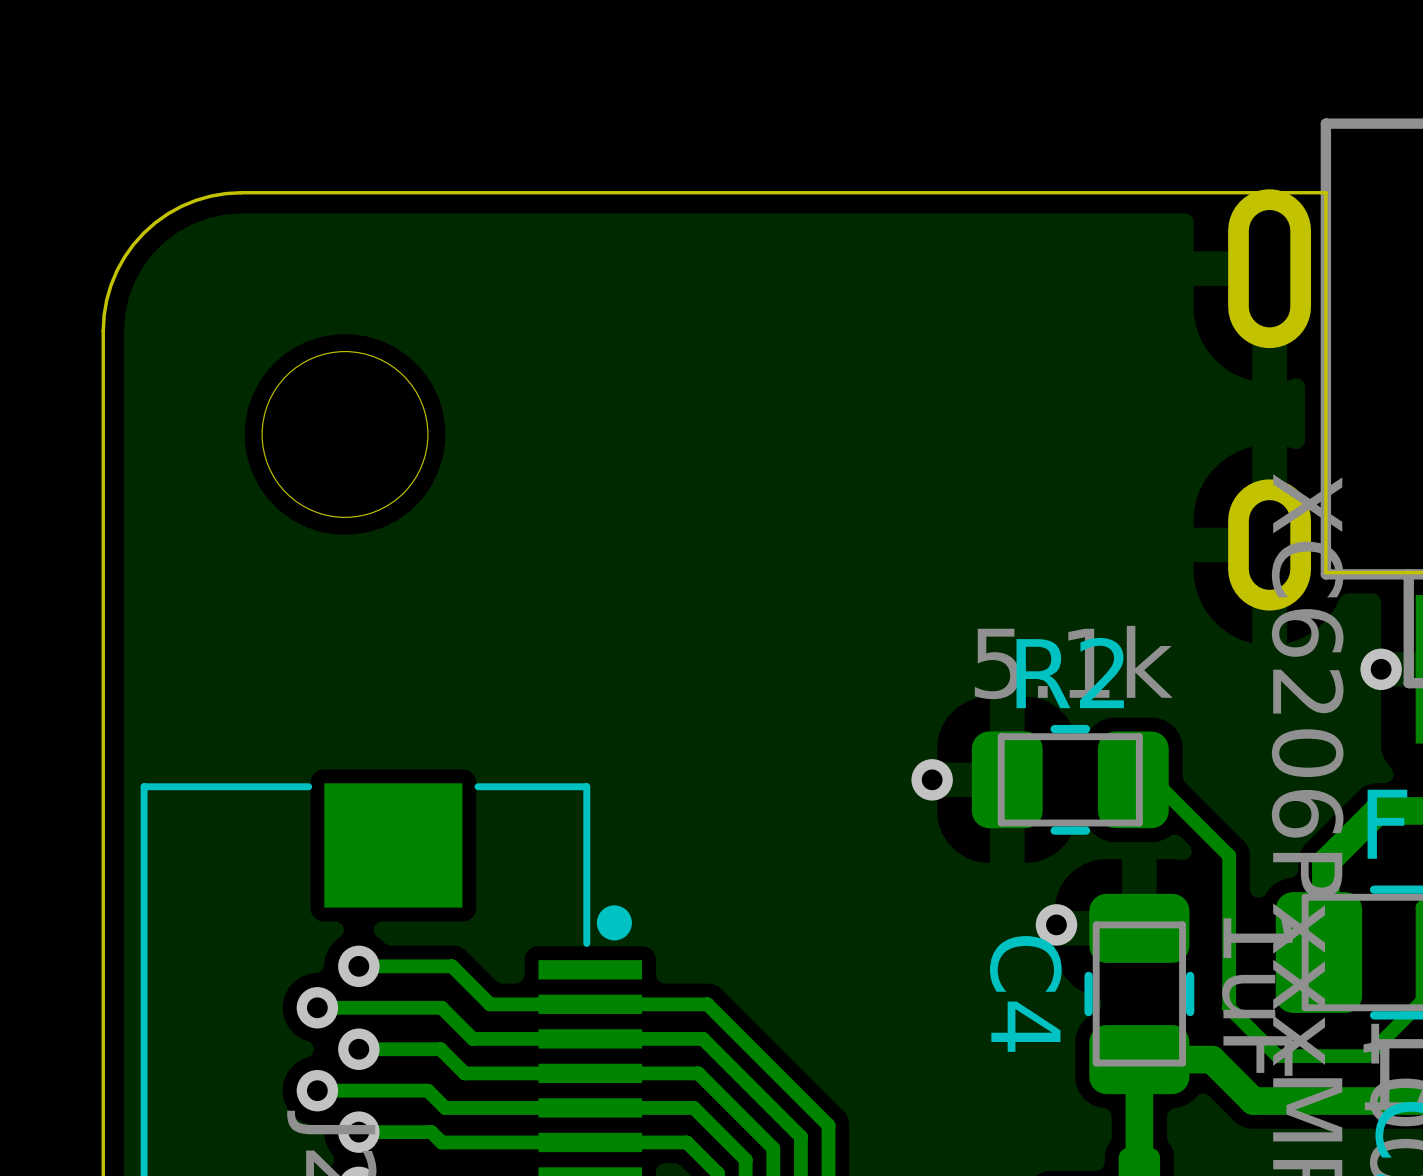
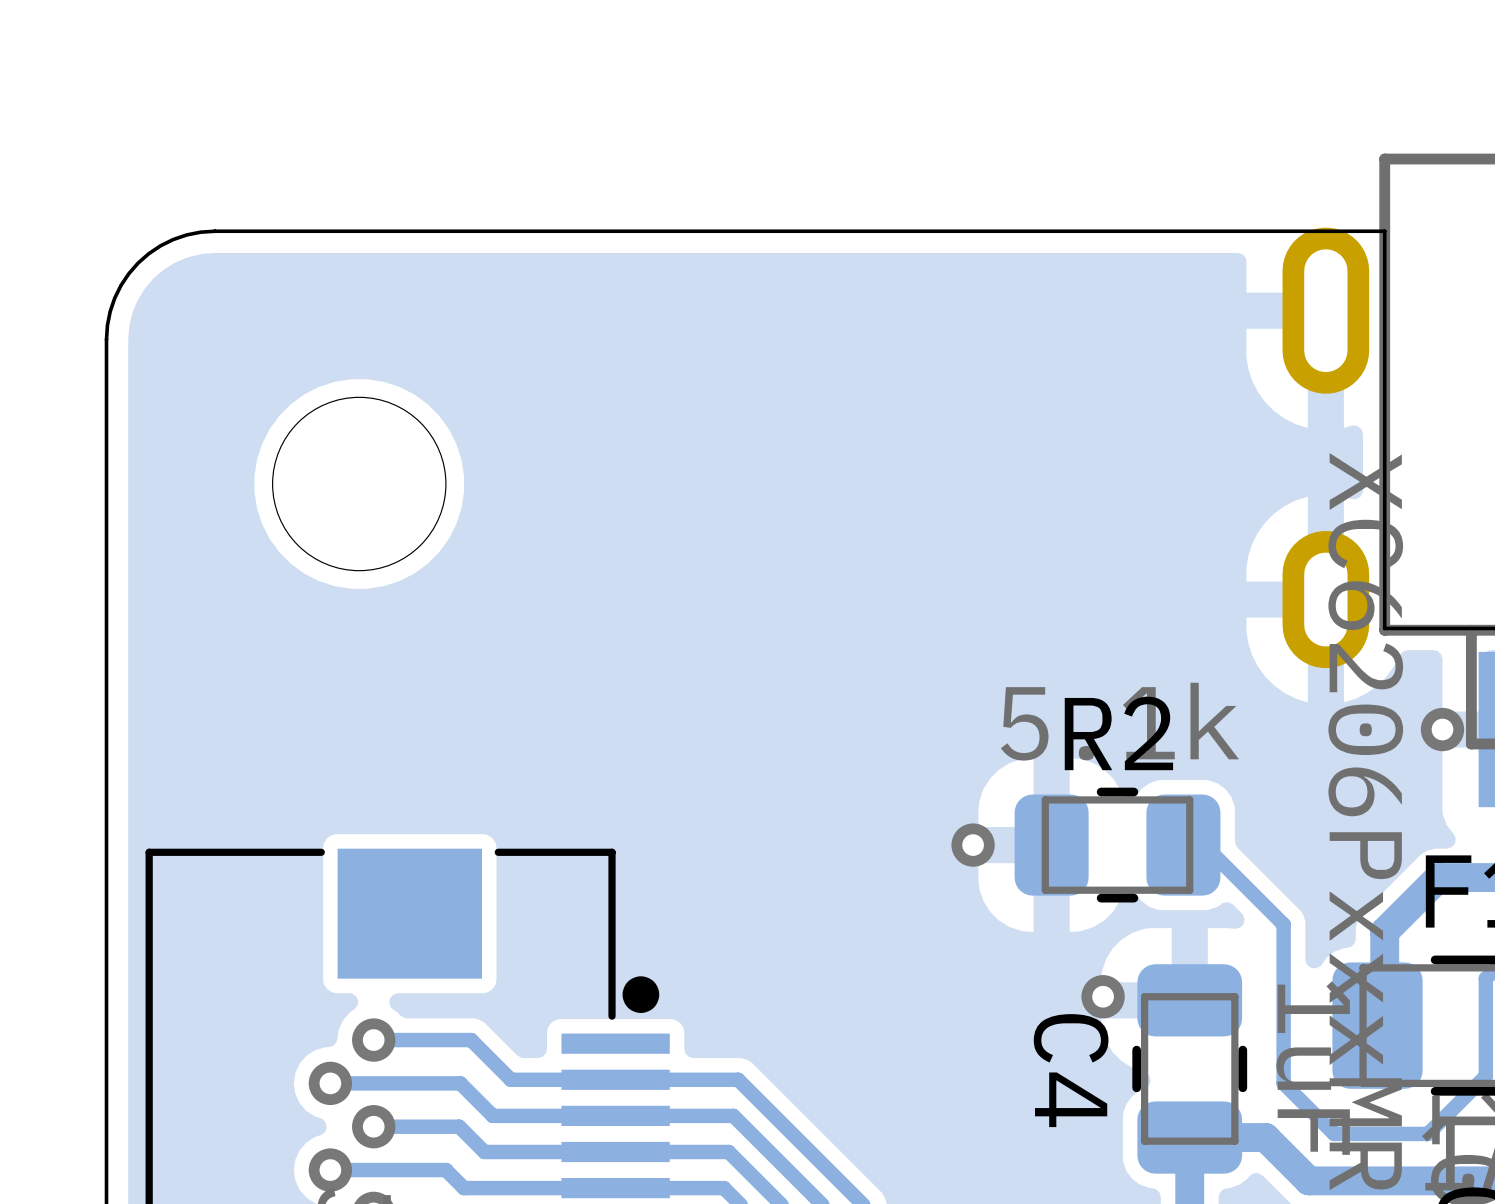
board edge: (241, 192) (210, 196) (181, 206) (155, 222) (143, 233) (124, 257) (111, 285) (104, 315) (103, 330) -> (250, 231) (214, 231) (186, 234) (160, 245) (138, 262) (121, 285) (110, 311) (106, 339) (106, 375)

